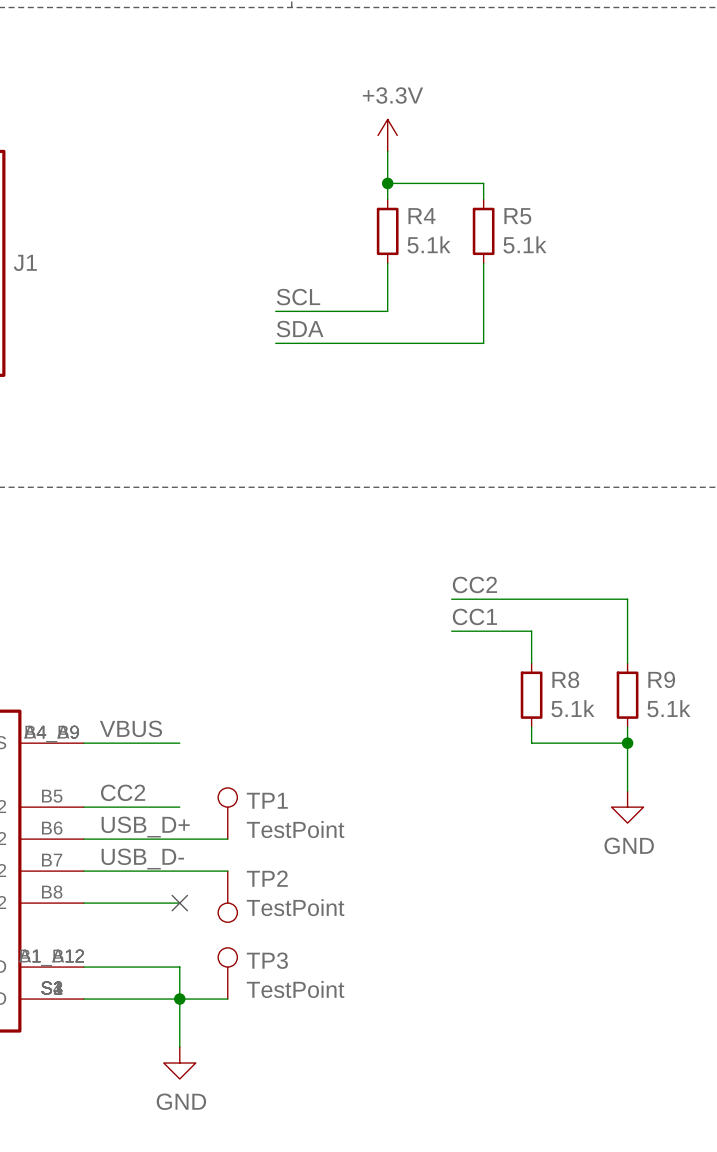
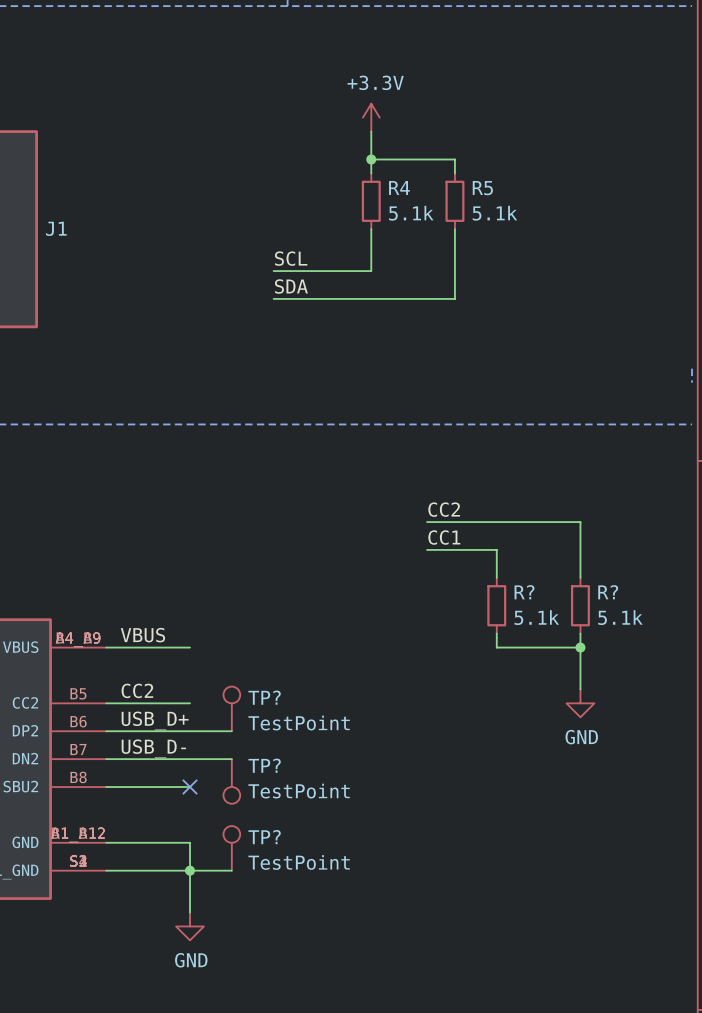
R8 name: R8 (565, 679) -> R? (524, 592)
R9 name: R9 (661, 679) -> R? (608, 592)
TP1 name: TP1 (267, 800) -> TP? (264, 697)
TP2 name: TP2 (267, 878) -> TP? (264, 765)
TP3 name: TP3 (267, 960) -> TP? (264, 837)

